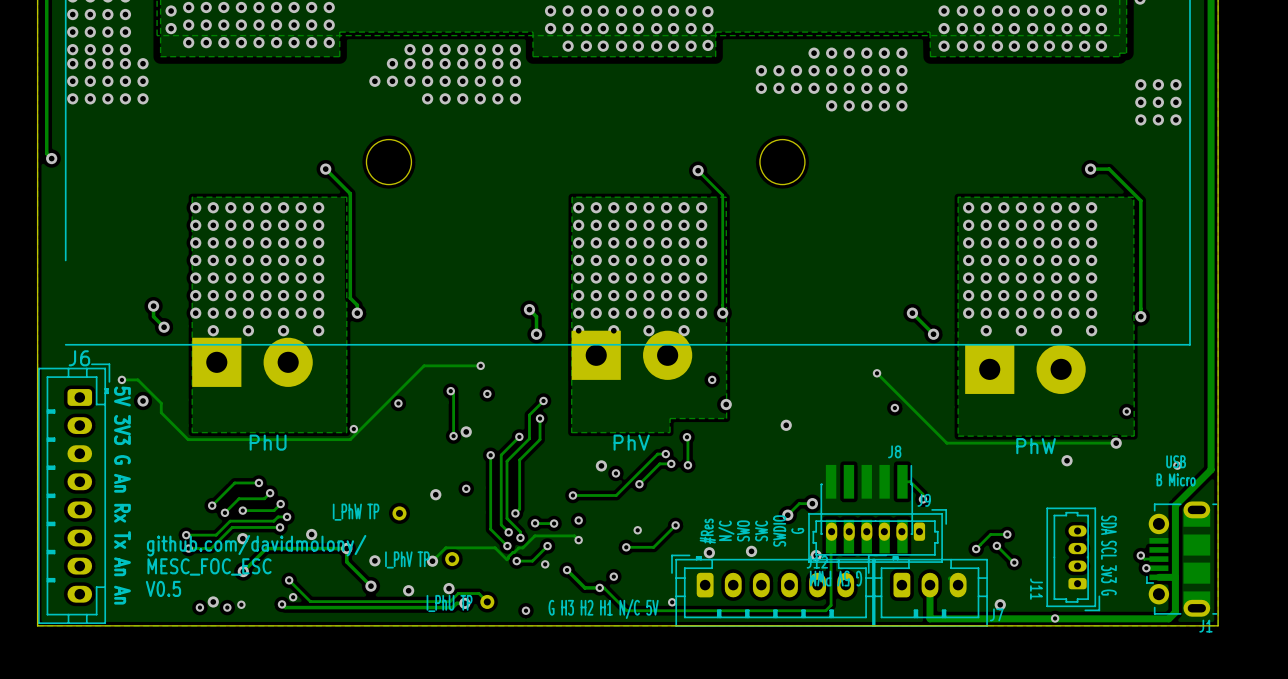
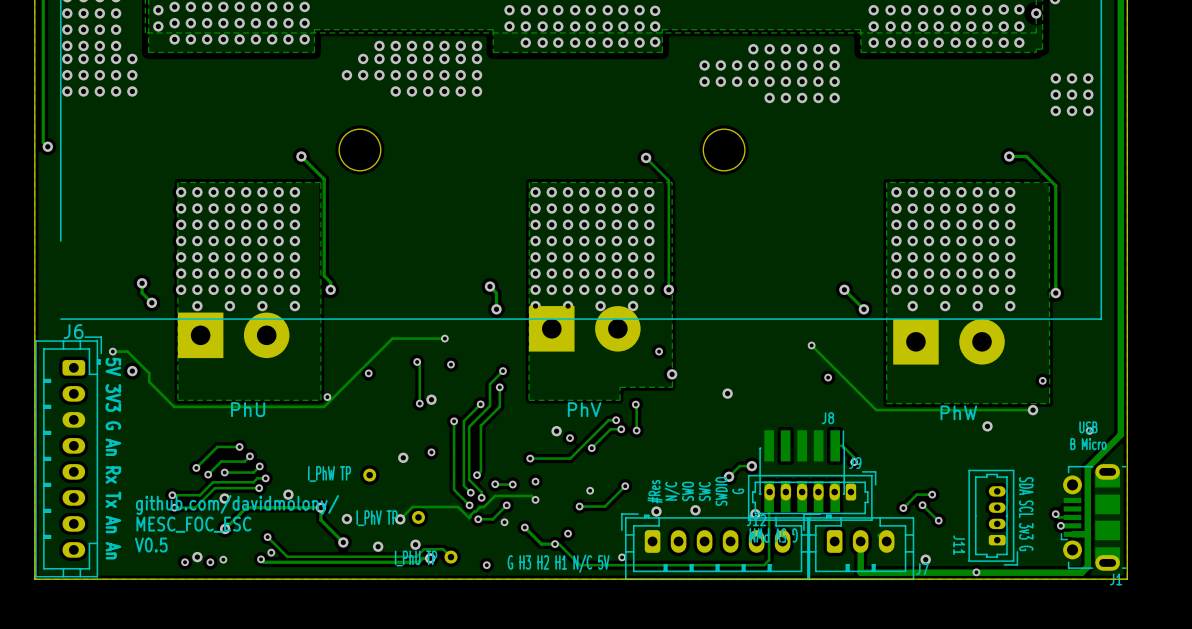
via: none -> (1036, 13)

